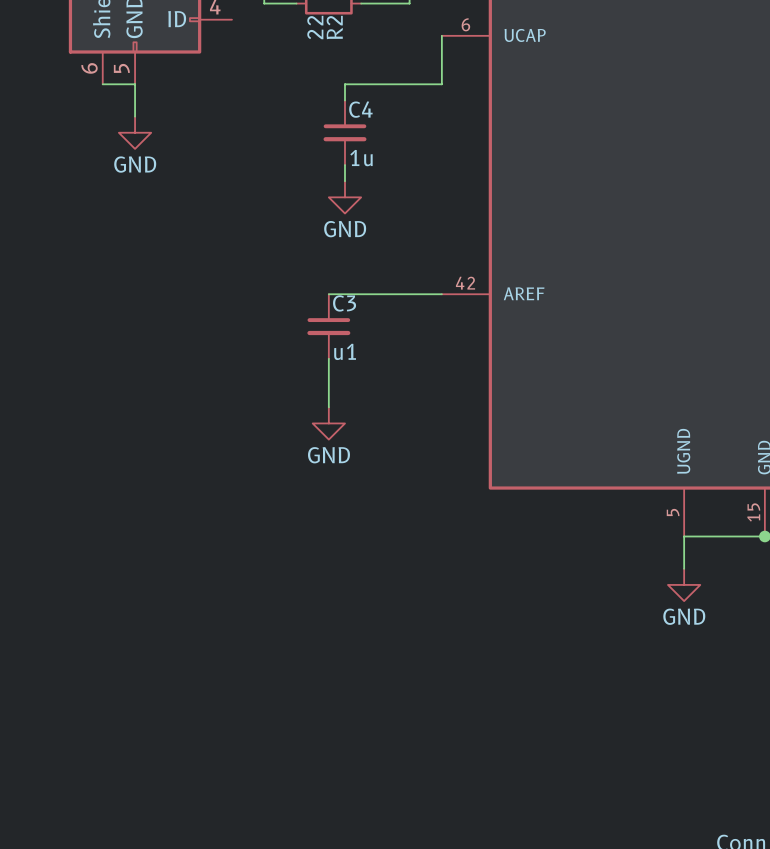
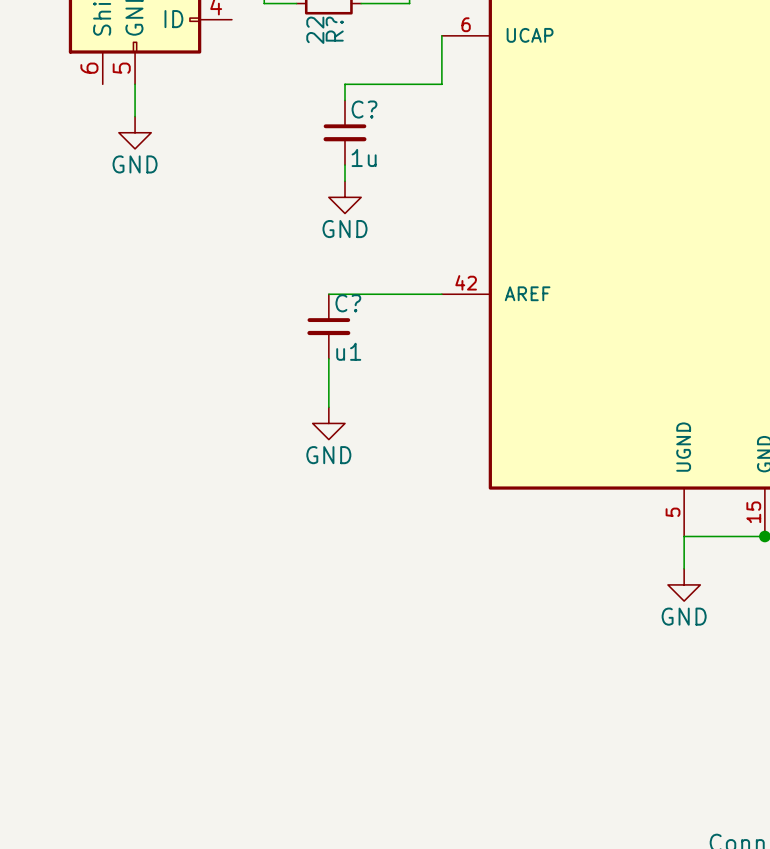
R2 name: R2 (334, 27) -> R? (334, 29)
wire: (102, 84) (135, 84) -> none
C4 name: C4 (360, 109) -> C? (364, 109)
C3 name: C3 (344, 303) -> C? (348, 303)

